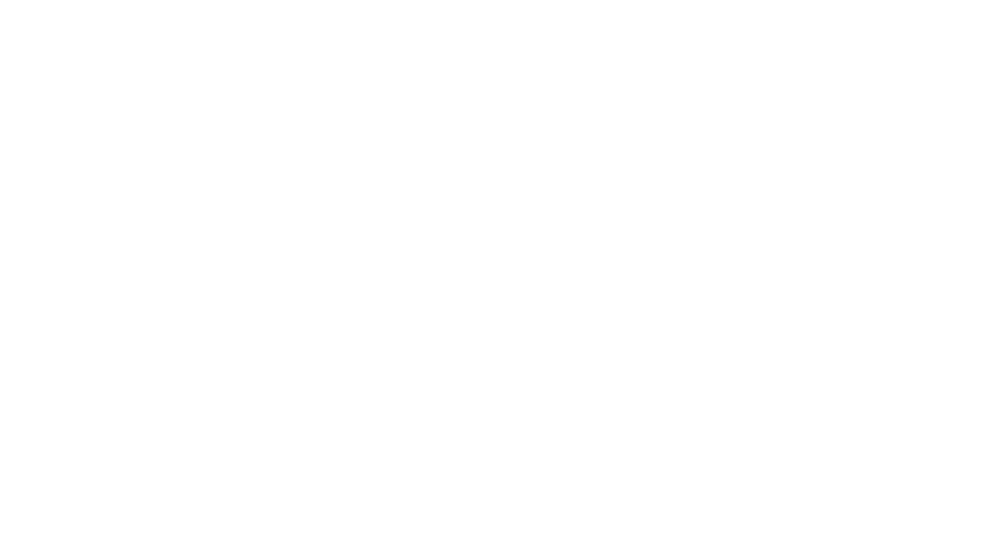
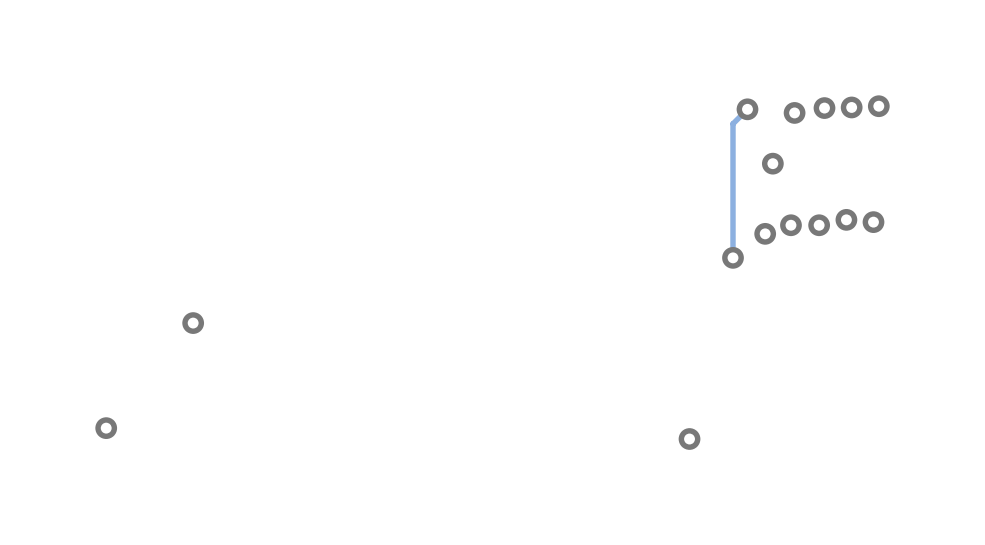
via: none -> (878, 106)
via: none -> (851, 107)
via: none -> (824, 108)
track: none -> (747, 109) (733, 123) (733, 257)
via: none -> (747, 109)
via: none -> (794, 112)
via: none -> (772, 163)
via: none -> (846, 219)
via: none -> (873, 222)
via: none -> (790, 225)
via: none -> (819, 225)
via: none -> (765, 233)
via: none -> (733, 257)
via: none -> (193, 323)
via: none -> (106, 428)
via: none -> (689, 439)

